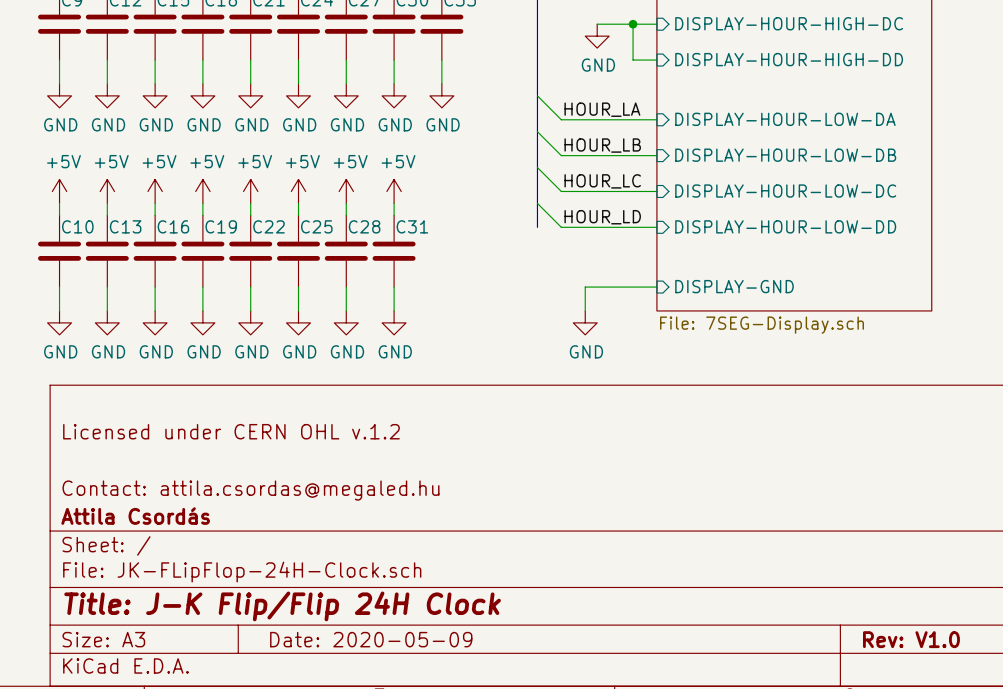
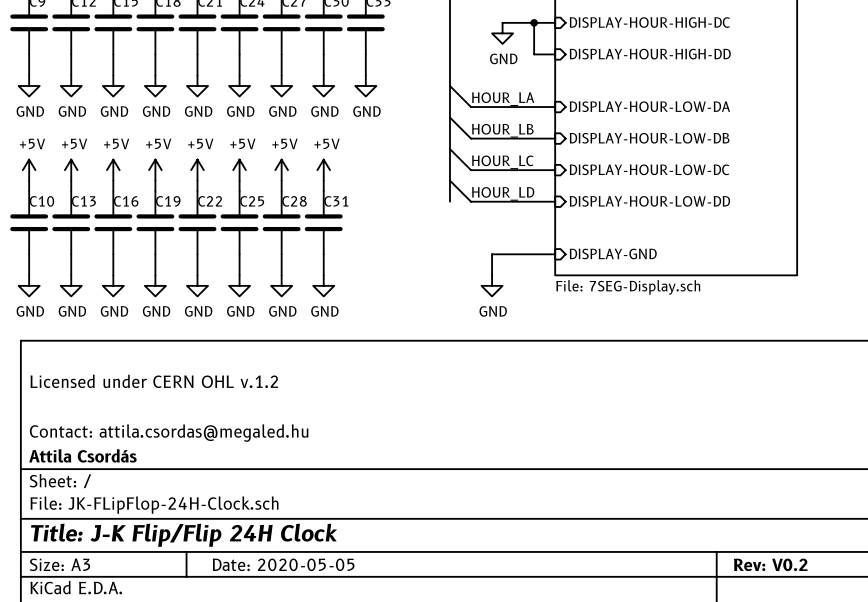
title block: Date: 2020-05-09 (371, 639) -> Date: 2020-05-05 (283, 564)
title block: Rev: V1.0 (911, 639) -> Rev: V0.2 (770, 564)

